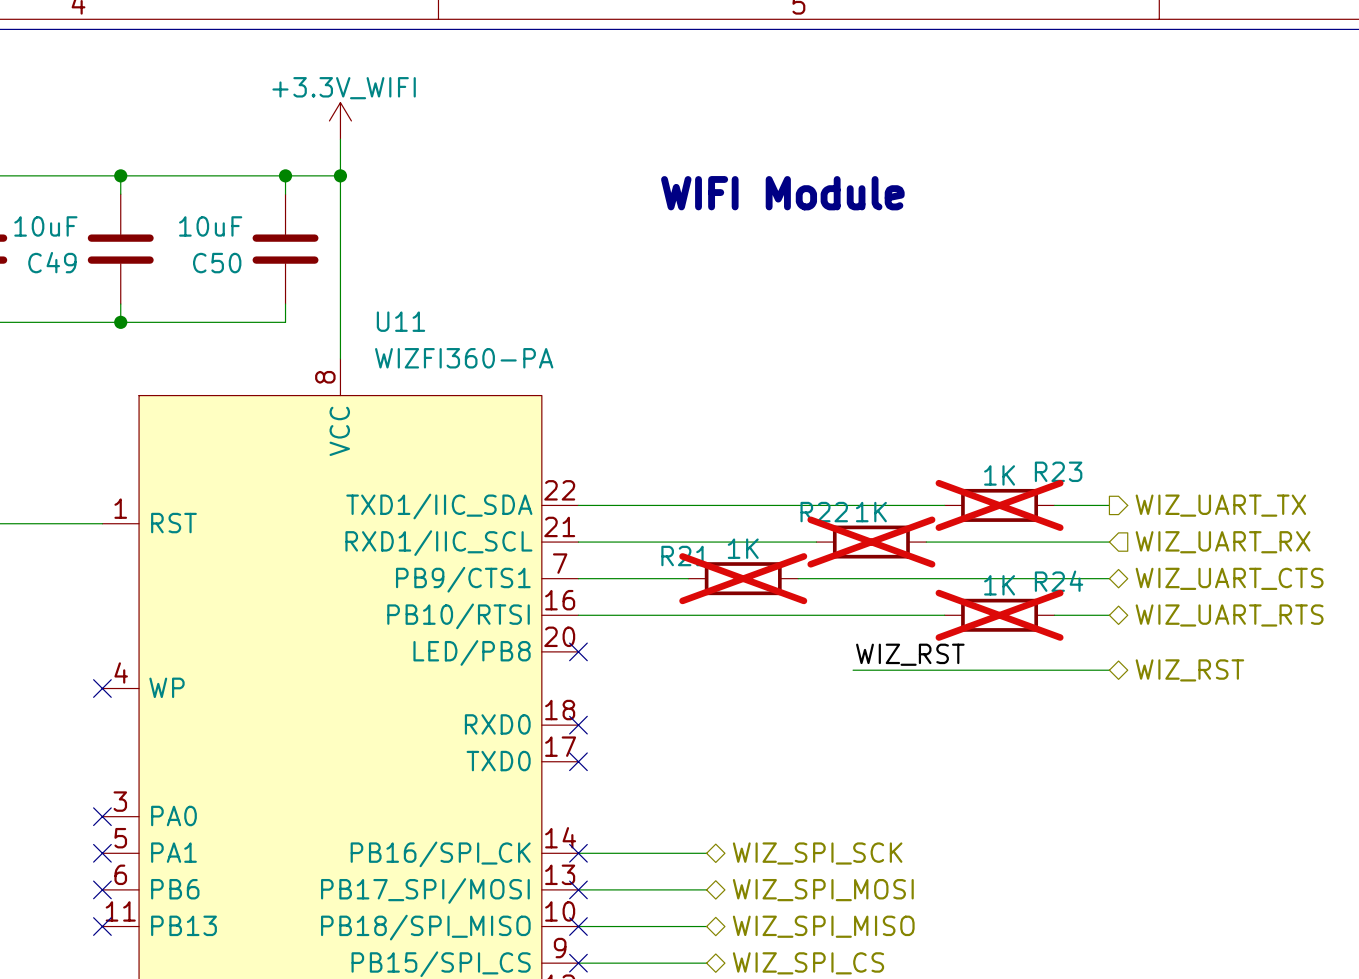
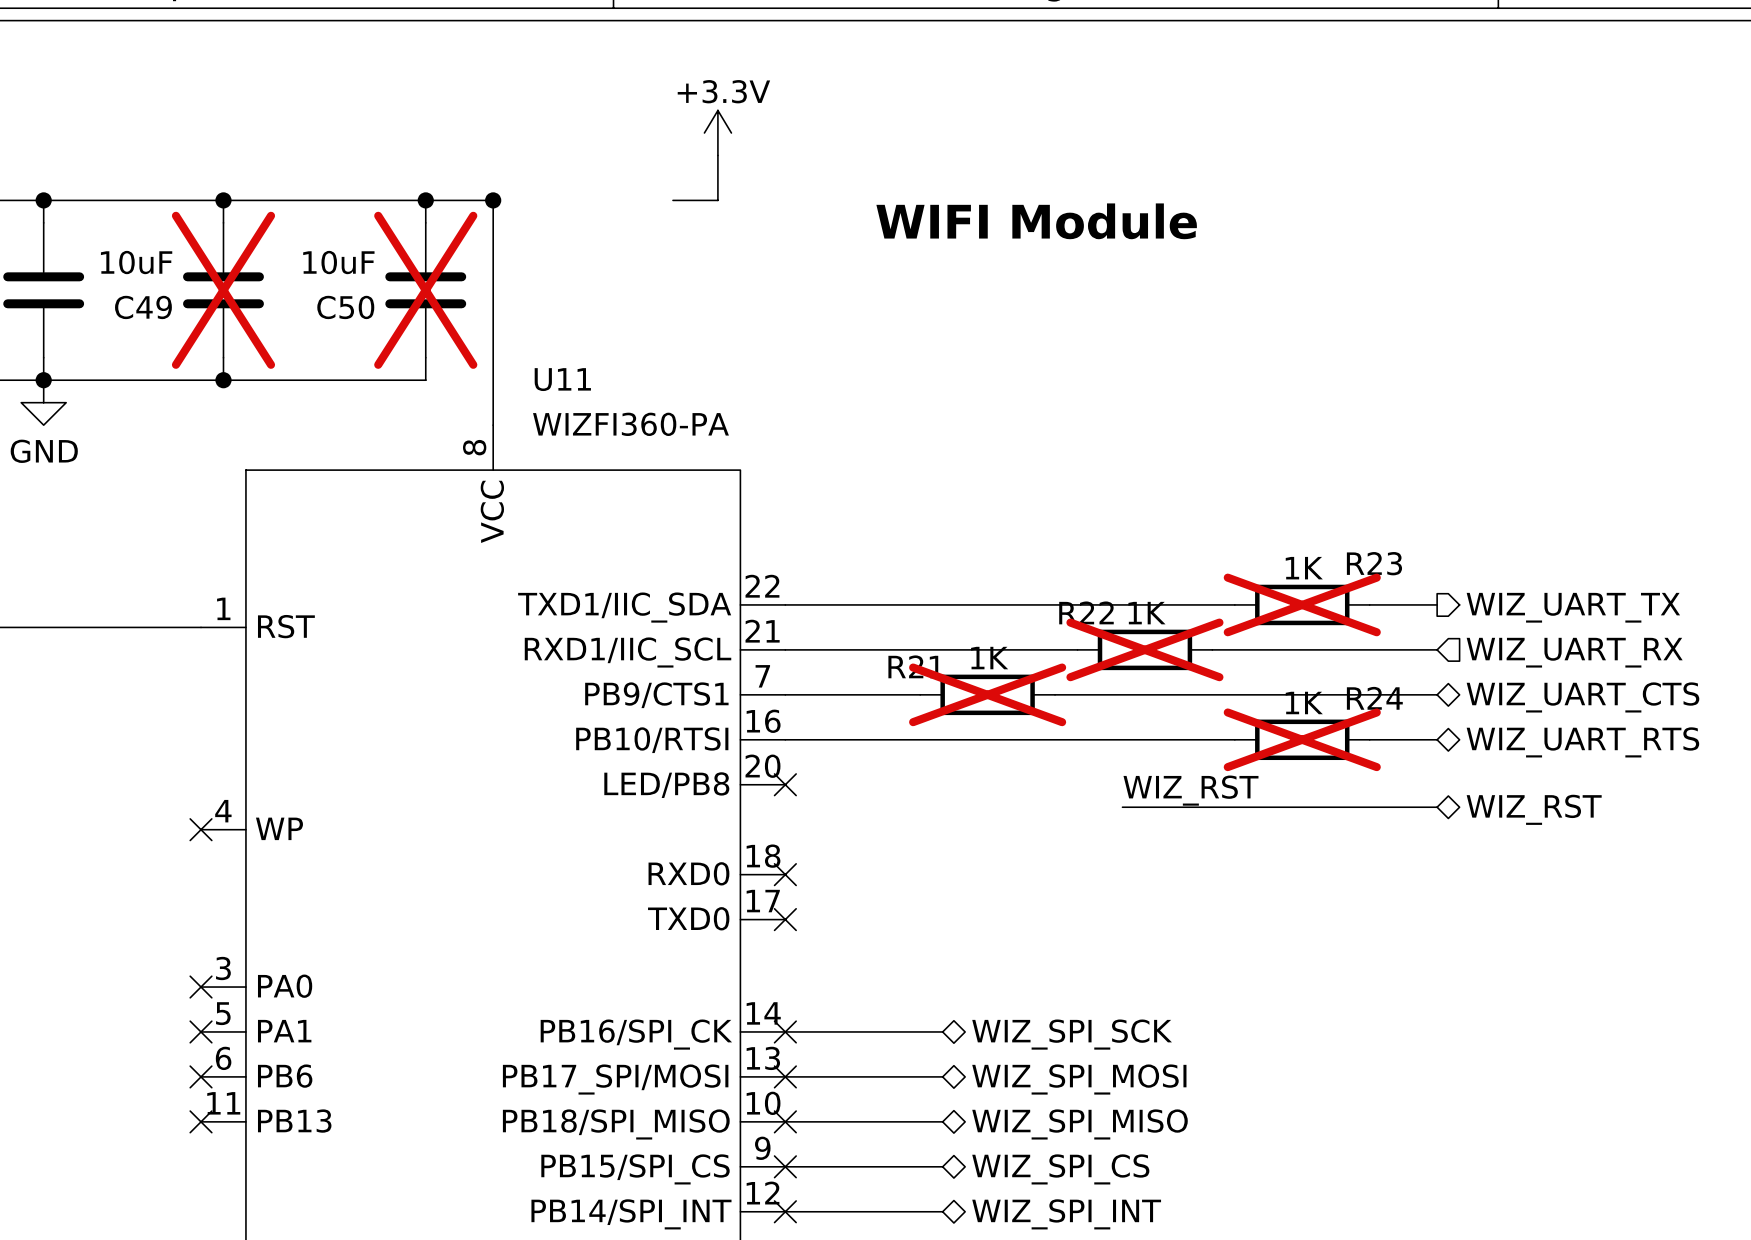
power symbol: +3.3V_WIFI (340, 120) -> none
power symbol: none -> +3.3V (717, 132)
wire: (340, 139) (340, 175) -> none
wire: none -> (717, 155) (717, 200) (672, 200)
C49 do-not-place cross: none -> (223, 290)
C50 do-not-place cross: none -> (425, 290)

